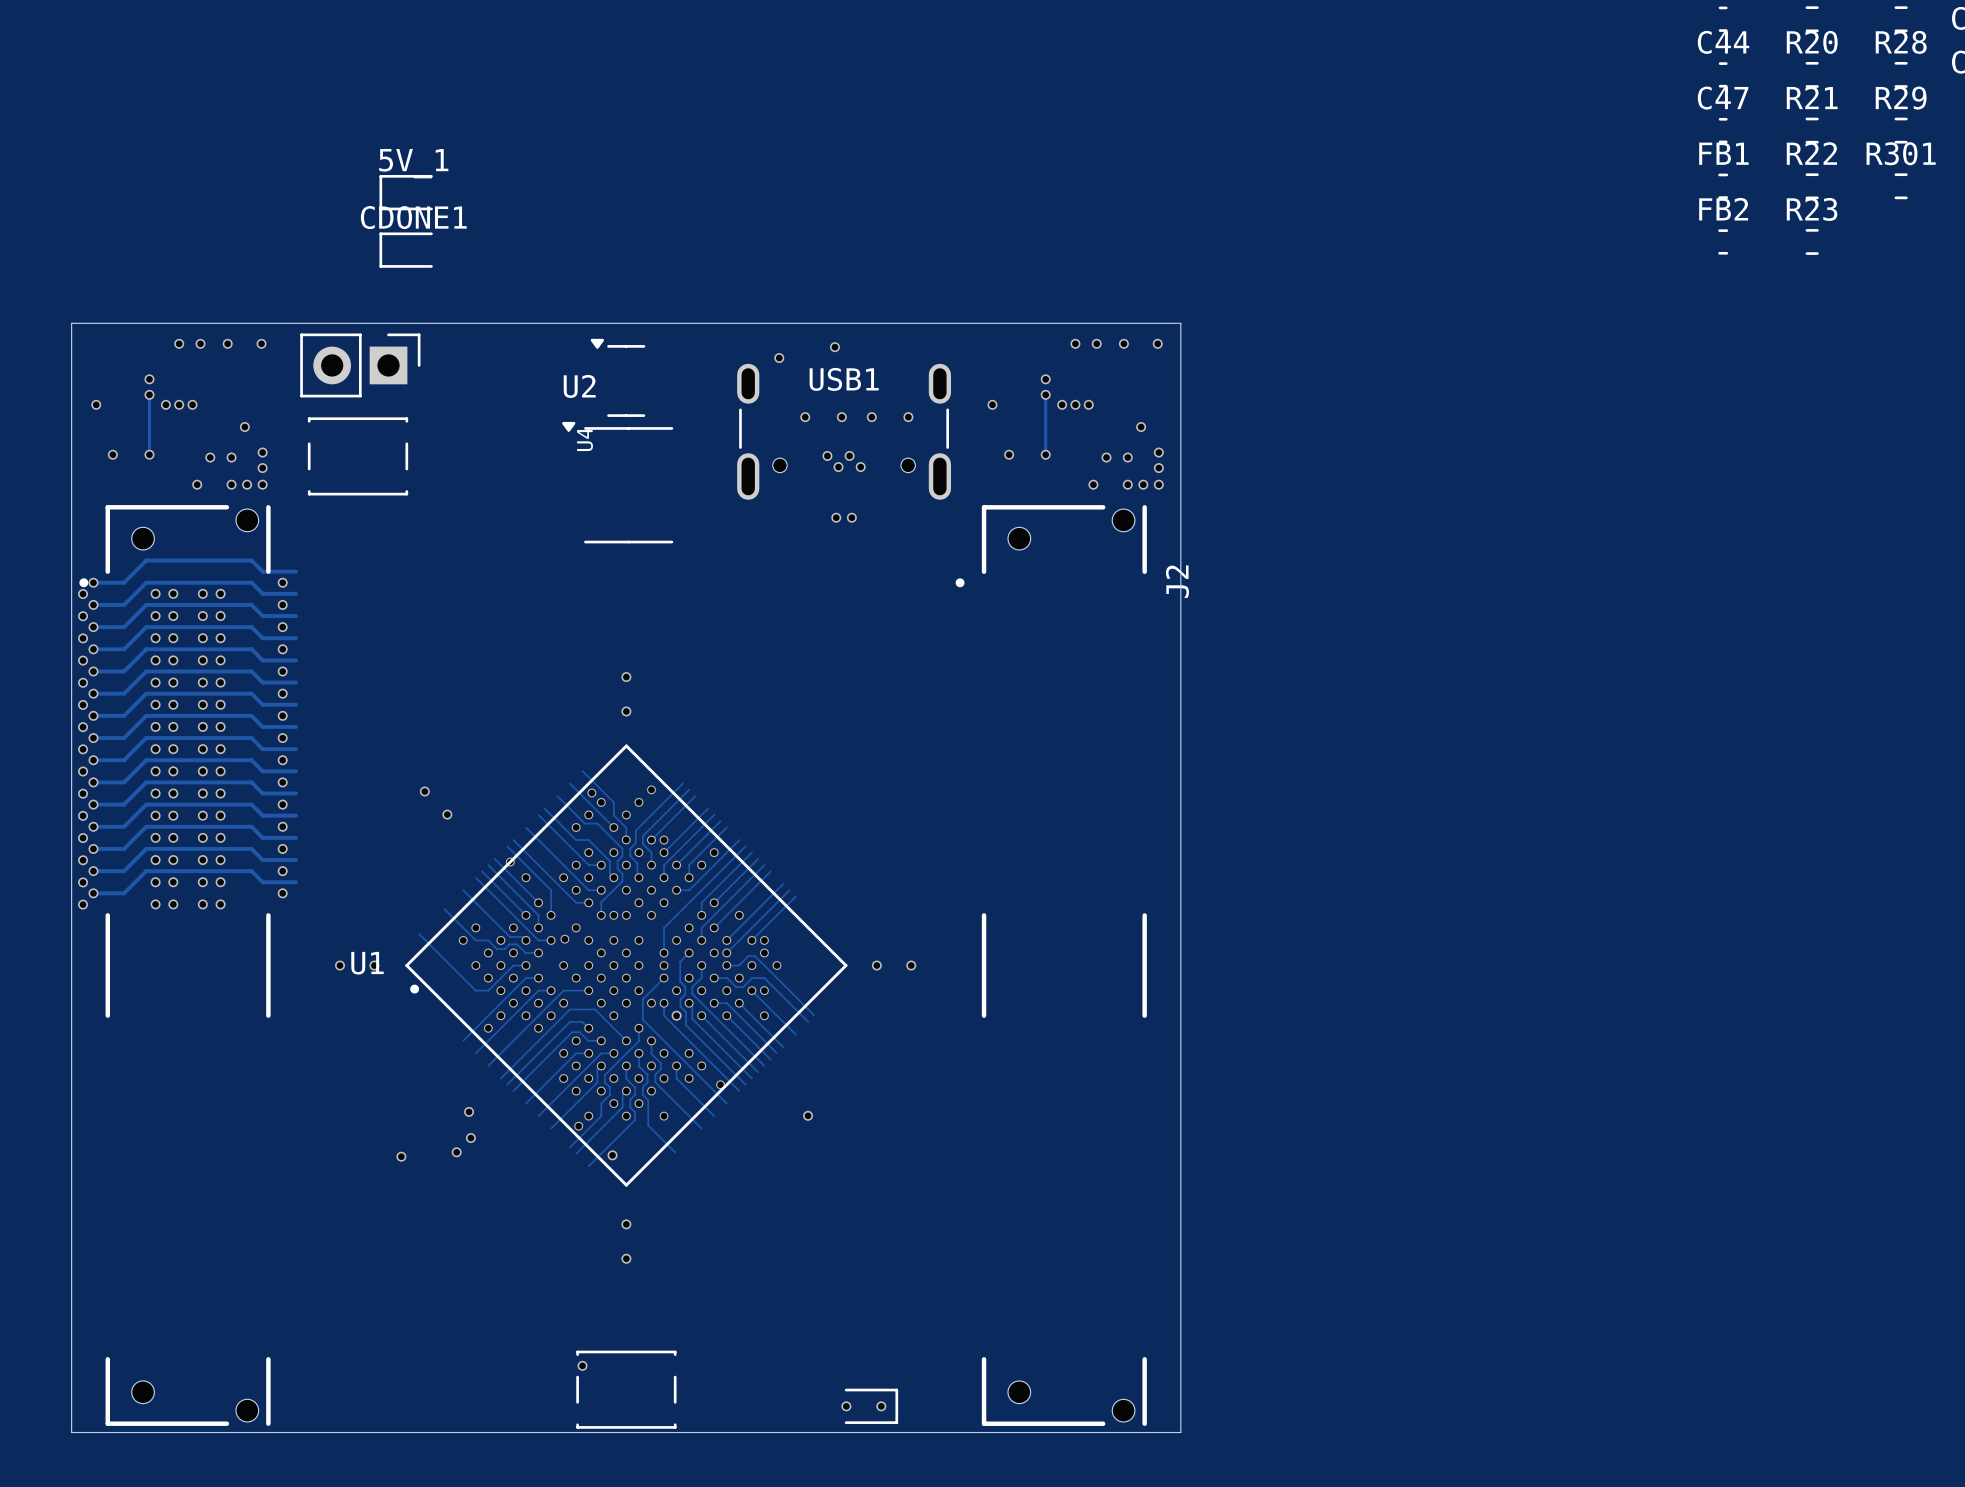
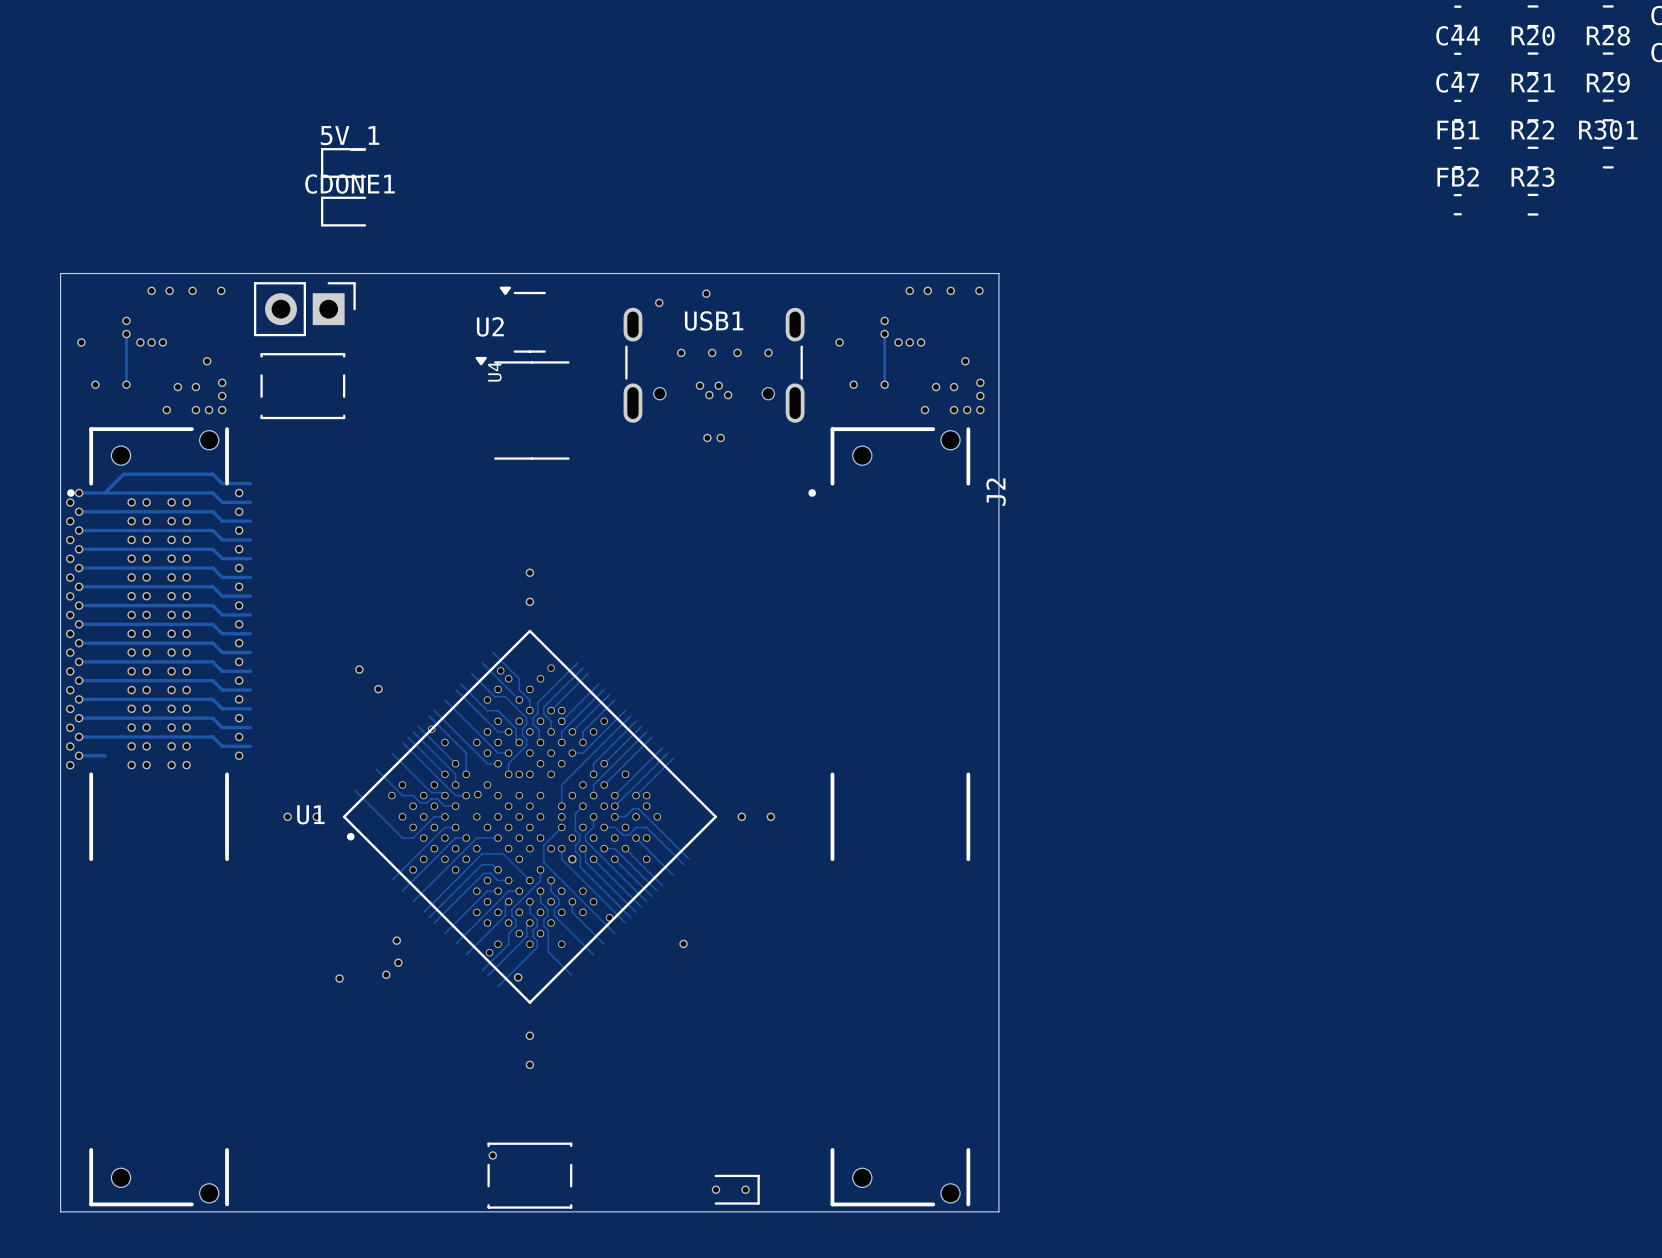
track: (146, 582) (124, 604) -> (123, 492) (104, 492)
track: (146, 604) (124, 627) -> (123, 511) (104, 511)
track: (146, 627) (124, 649) -> (123, 530) (104, 530)
track: (146, 649) (124, 671) -> (123, 549) (104, 549)
track: (146, 671) (124, 693) -> (123, 568) (104, 568)
track: (146, 693) (124, 715) -> (123, 586) (104, 586)
track: (146, 715) (124, 738) -> (123, 605) (104, 605)
track: (146, 738) (124, 760) -> (123, 624) (104, 624)
track: (146, 760) (124, 782) -> (123, 643) (104, 643)
track: (146, 782) (124, 804) -> (123, 661) (104, 661)
track: (146, 804) (124, 826) -> (123, 680) (104, 680)
track: (146, 826) (124, 848) -> (123, 699) (104, 699)
track: (146, 848) (124, 871) -> (123, 718) (104, 718)
track: (146, 871) (124, 893) -> (123, 736) (104, 736)

